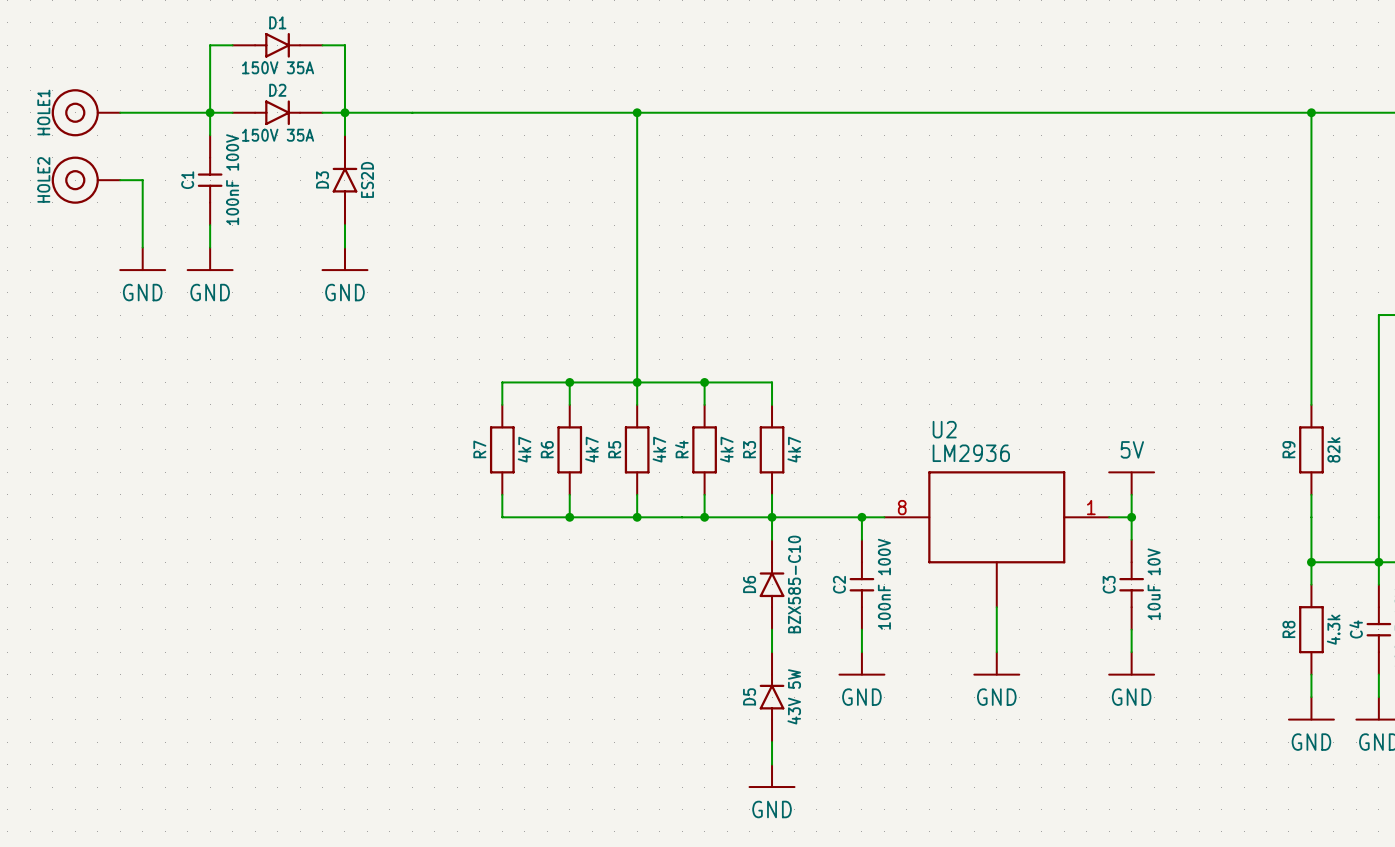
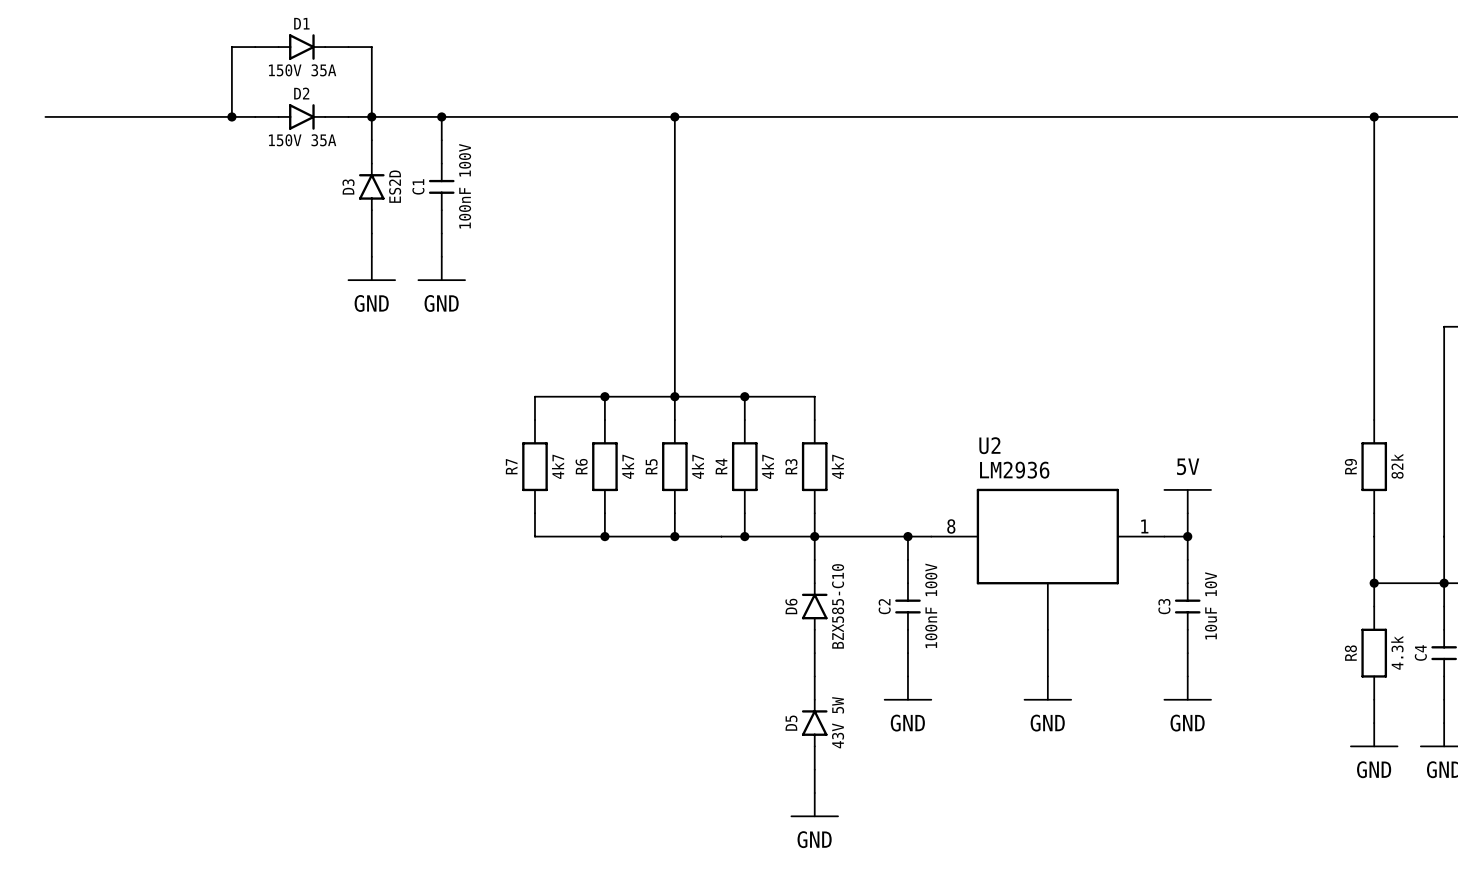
wire: none -> (45, 116) (138, 116)
HOLE1: (85, 112) -> none
wire: (210, 112) (210, 135) -> (441, 116) (441, 140)
junction: none -> (441, 116)
HOLE2: (85, 180) -> none
wire: (120, 180) (142, 180) (142, 247) -> none
C1 position: (210, 180) -> (441, 186)
wire: (210, 225) (210, 247) -> (441, 233) (441, 256)
power symbol: GND (142, 259) -> none
power symbol: GND (210, 259) -> none
power symbol: none -> GND (441, 268)

